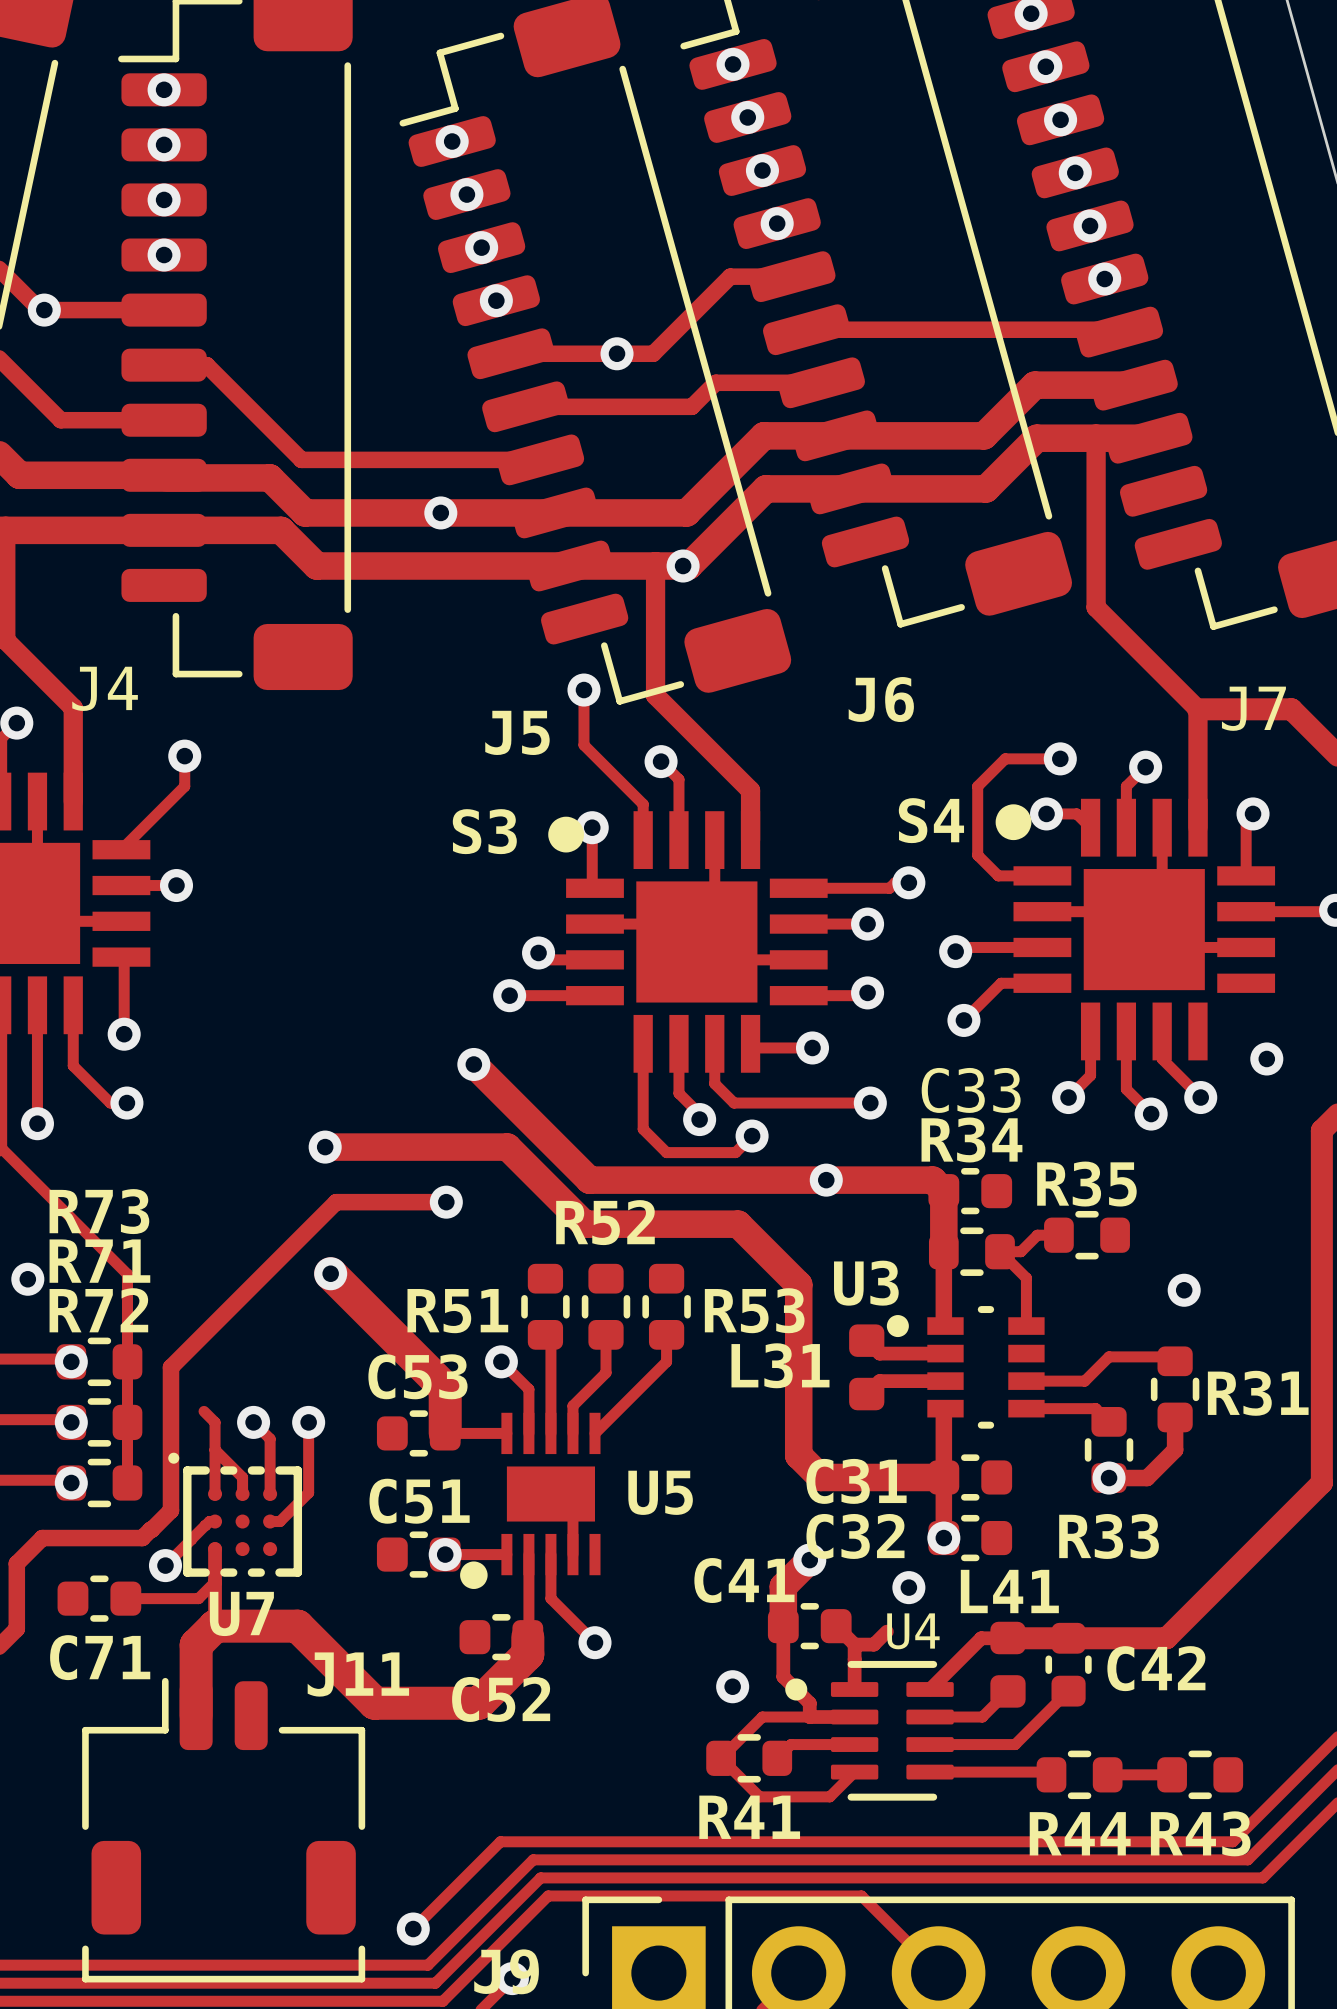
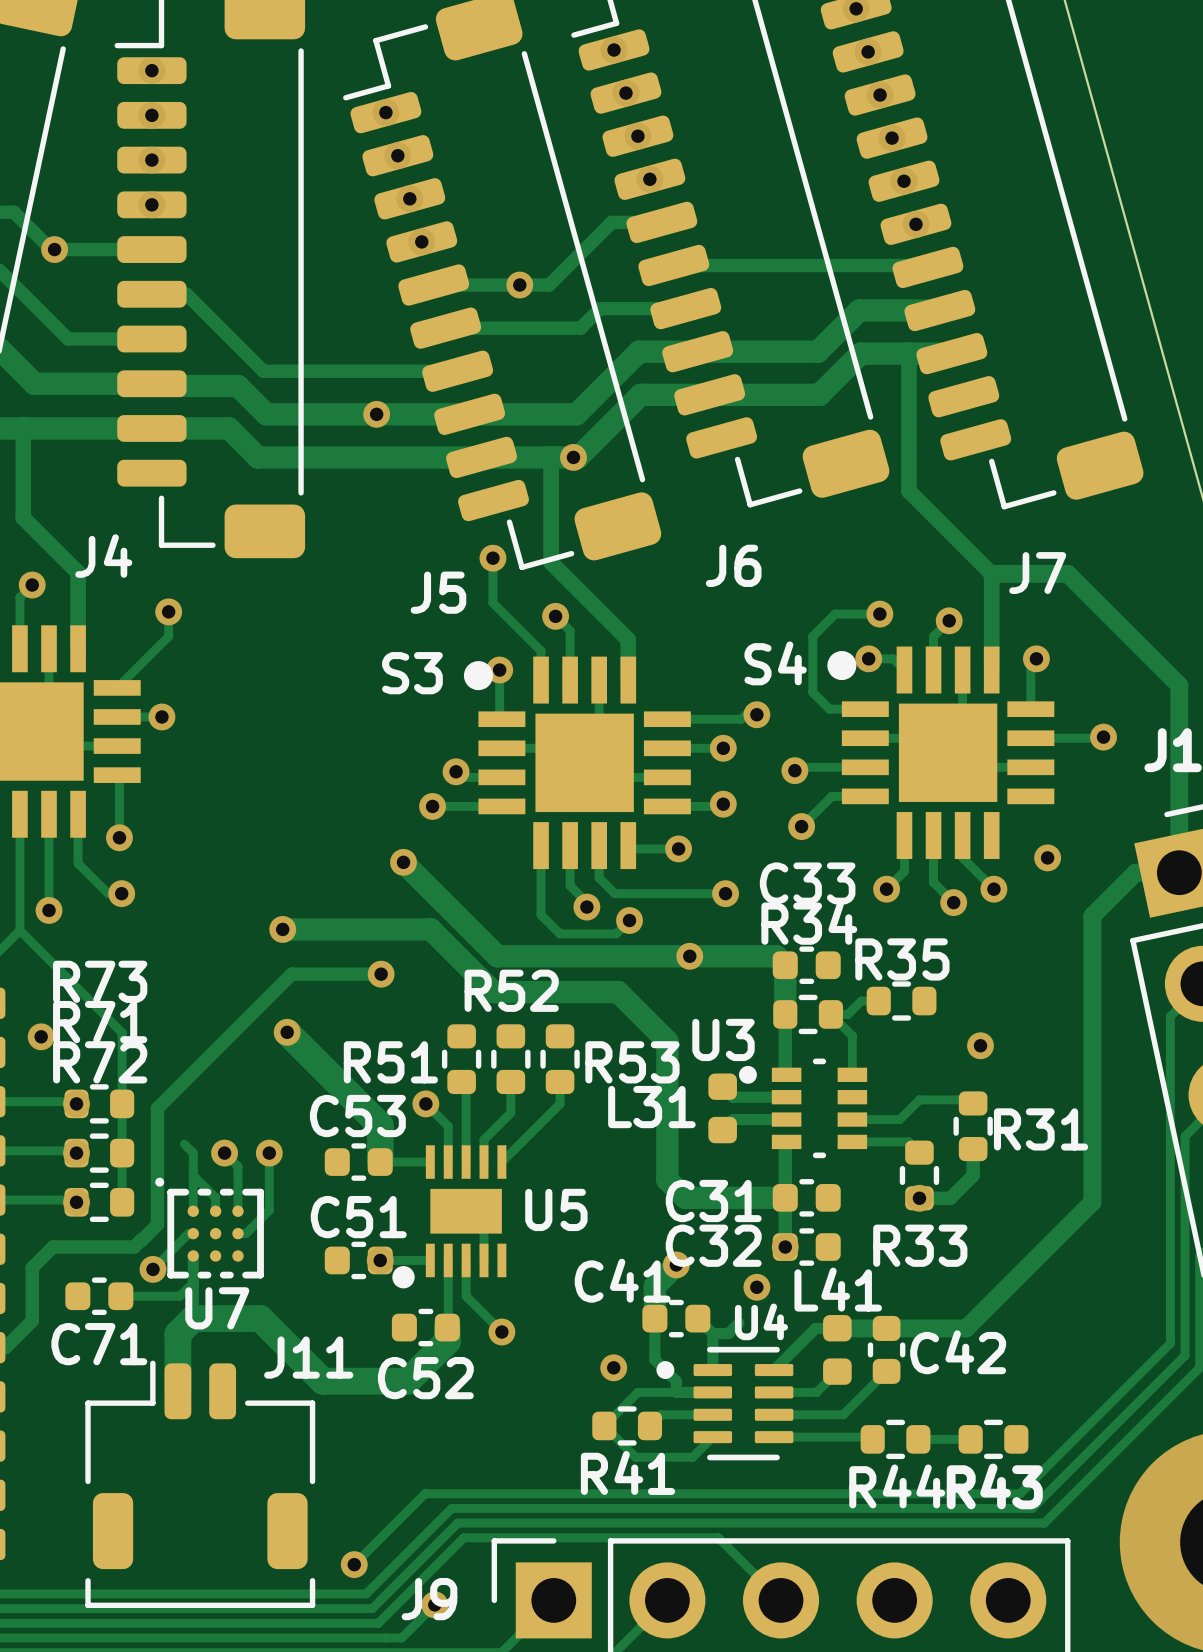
track: (259, 530) (281, 530) (316, 566) -> (229, 428) (258, 457) (275, 457)

